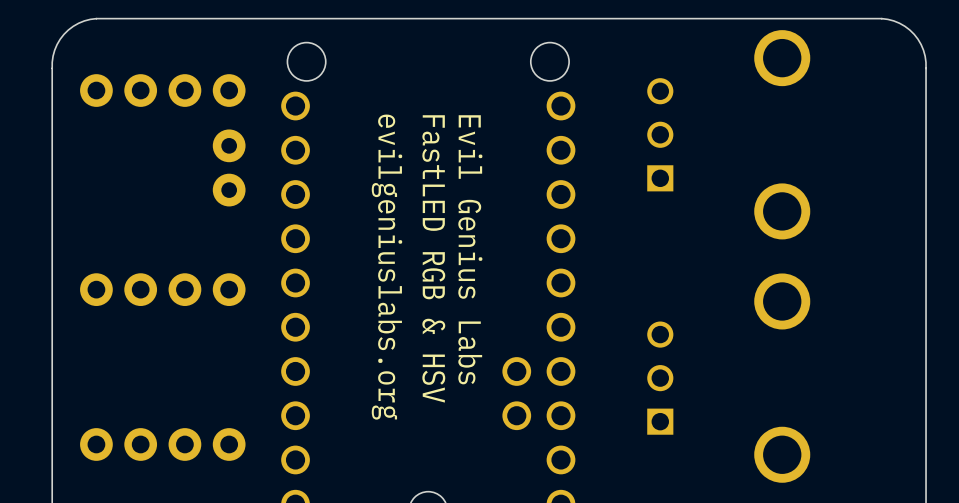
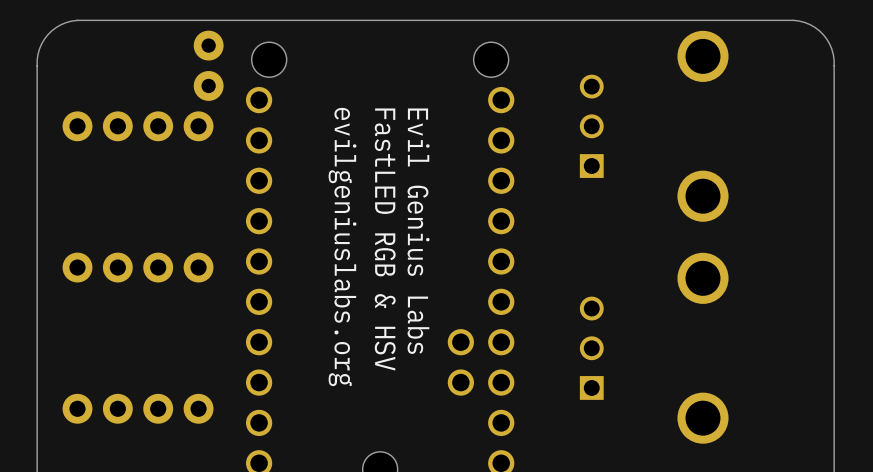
part position: (162, 90) -> (138, 126)
part position: (229, 167) -> (208, 65)

